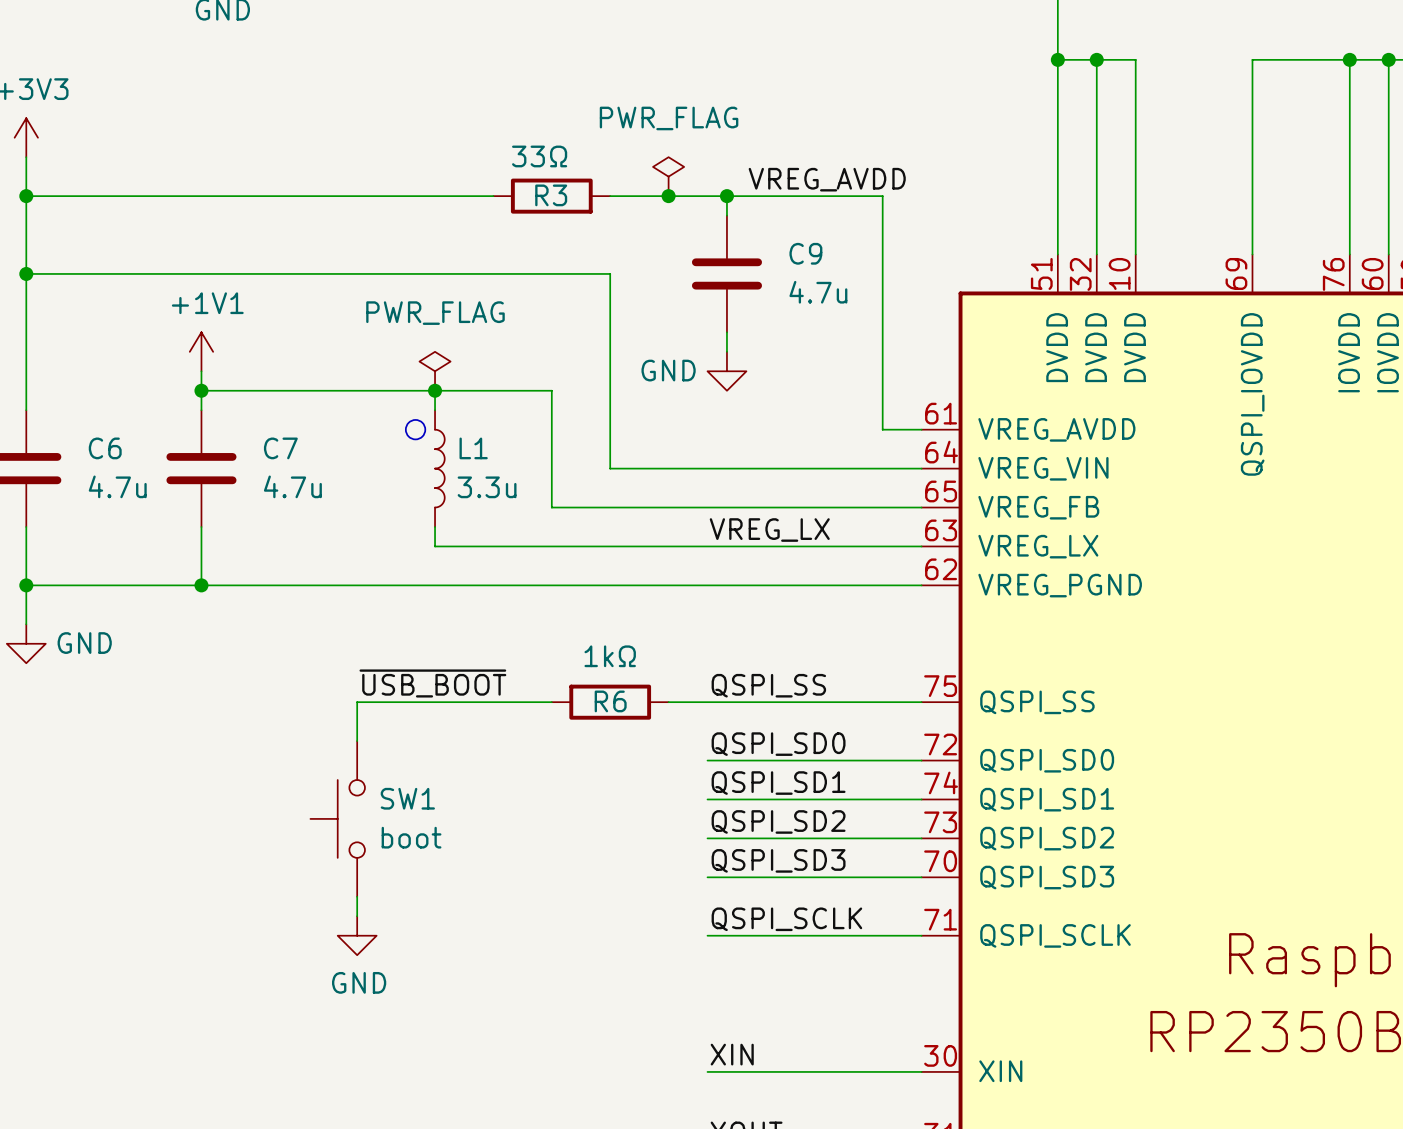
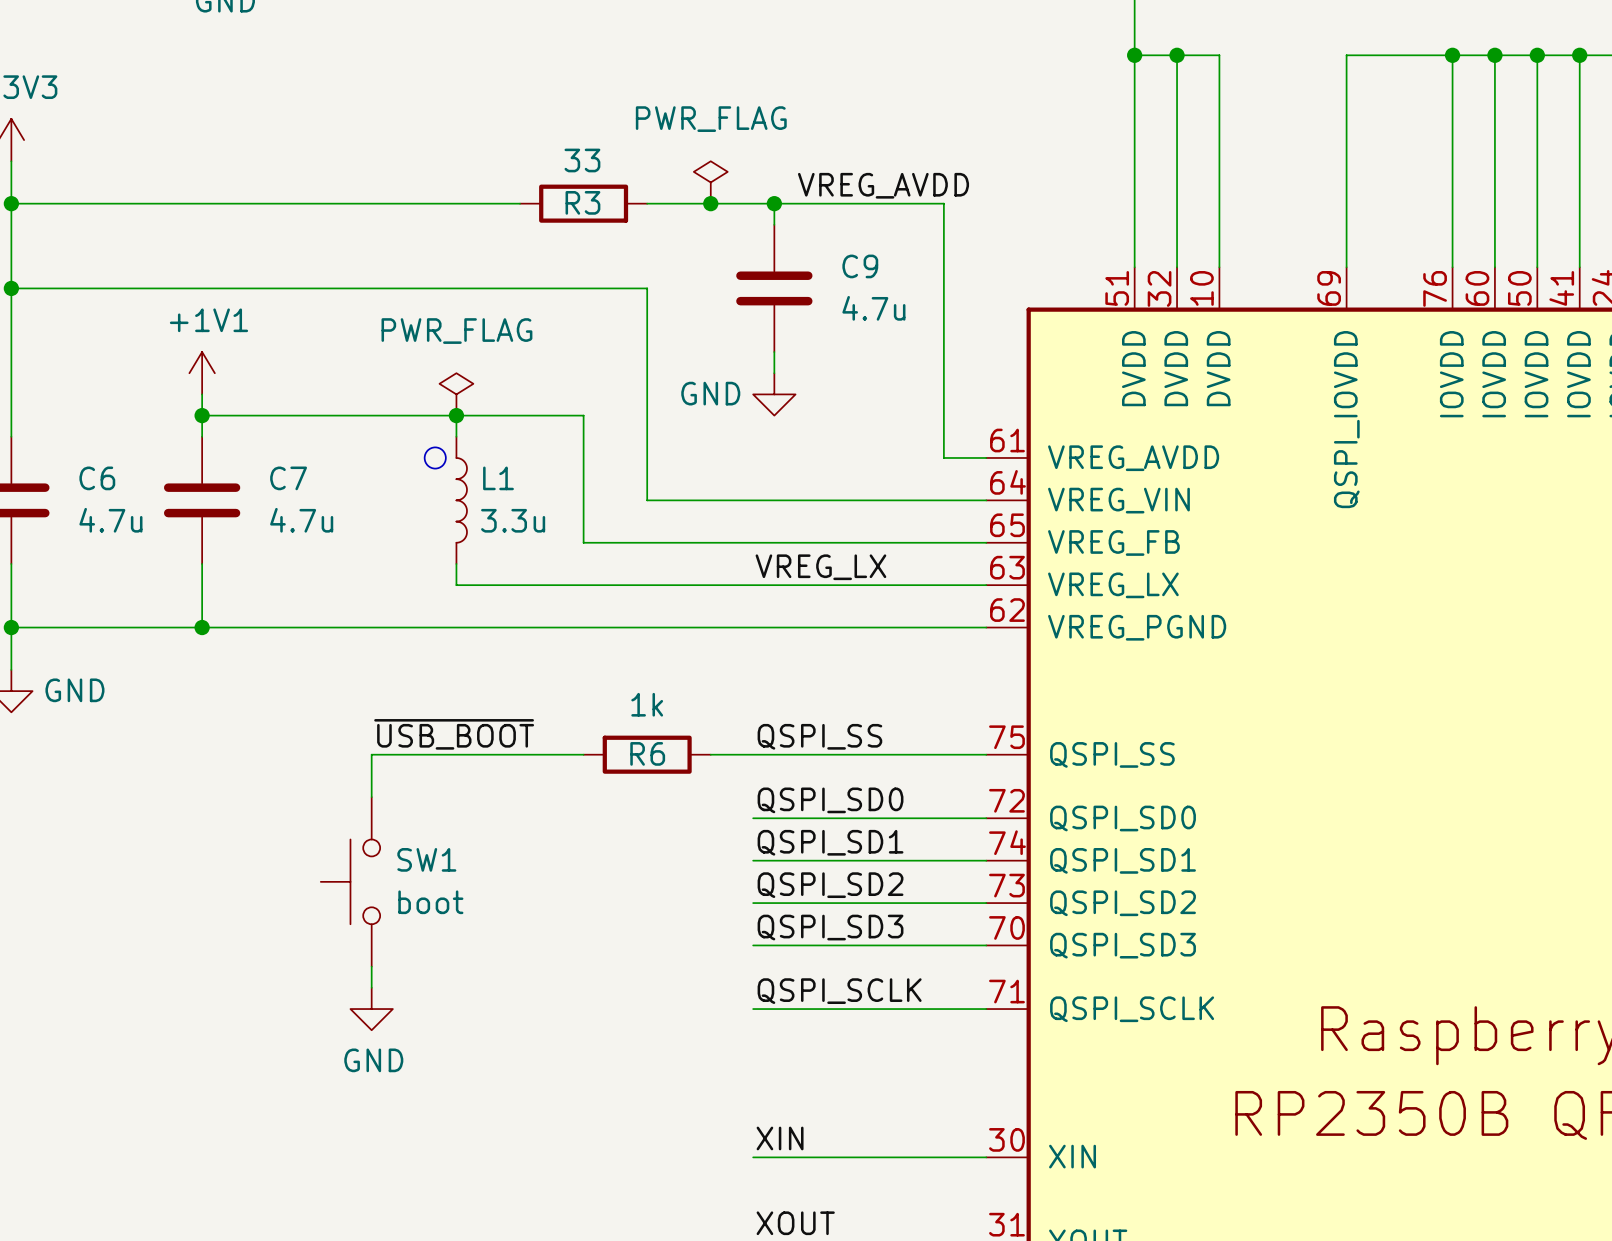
R3 value: 33Ω (539, 156) -> 33 (582, 160)
R6 value: 1kΩ (610, 656) -> 1k (647, 704)

